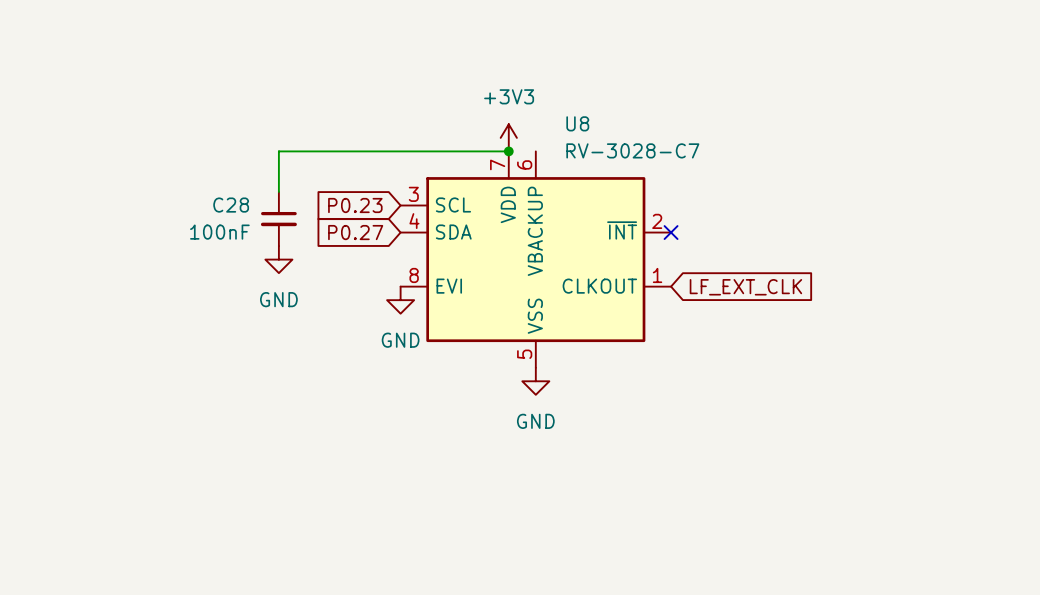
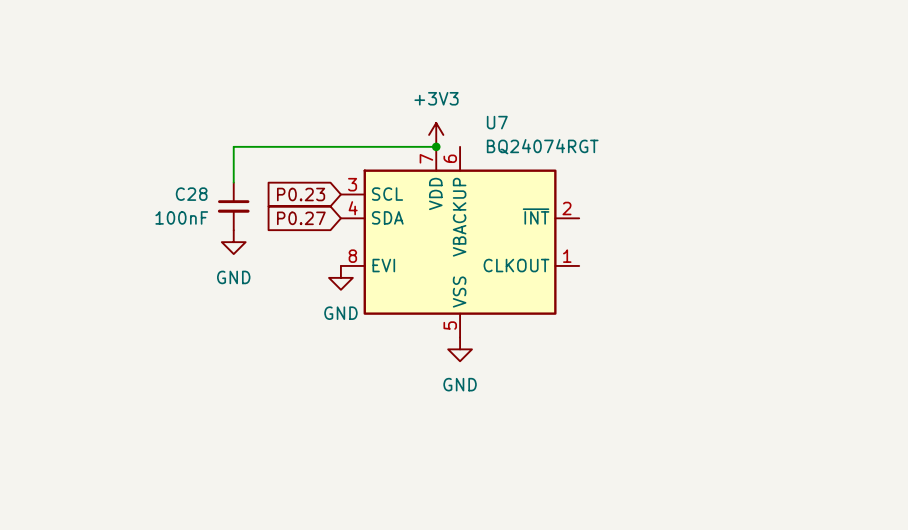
U8 name: U8 (577, 123) -> U7 (497, 122)
U8 value: RV-3028-C7 (632, 150) -> BQ24074RGT (542, 146)
no-connect mark: (671, 232) -> none
global label: LF_EXT_CLK (745, 287) -> none

